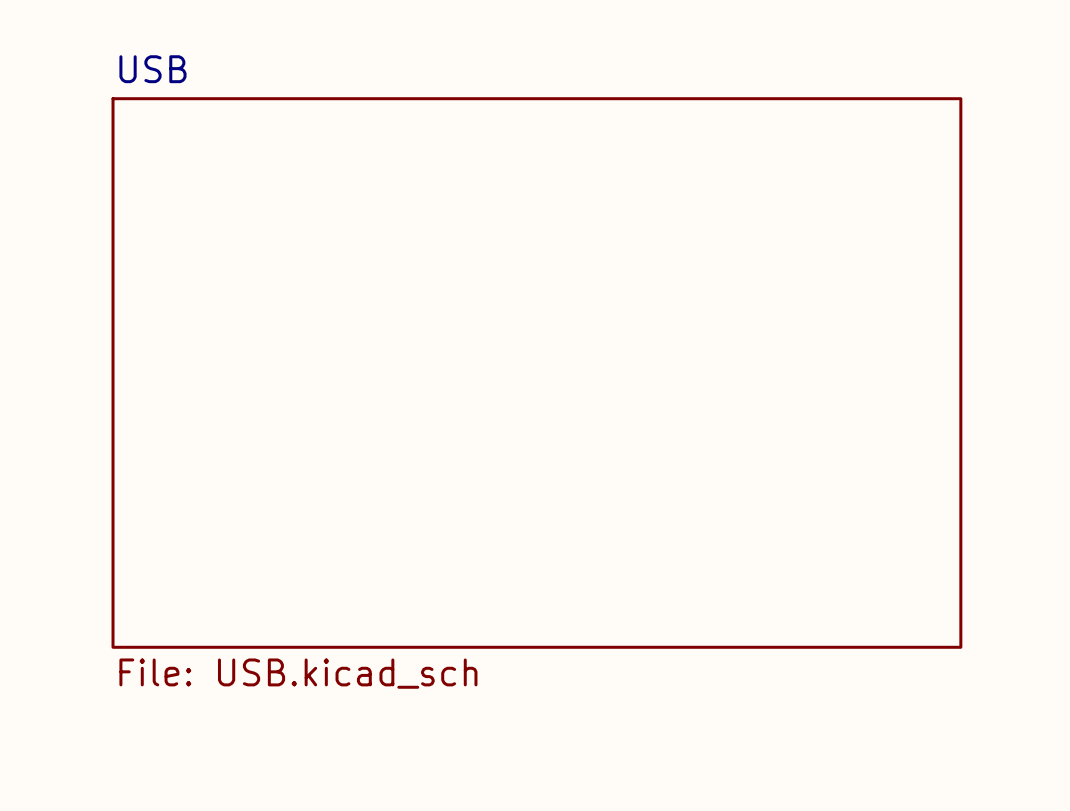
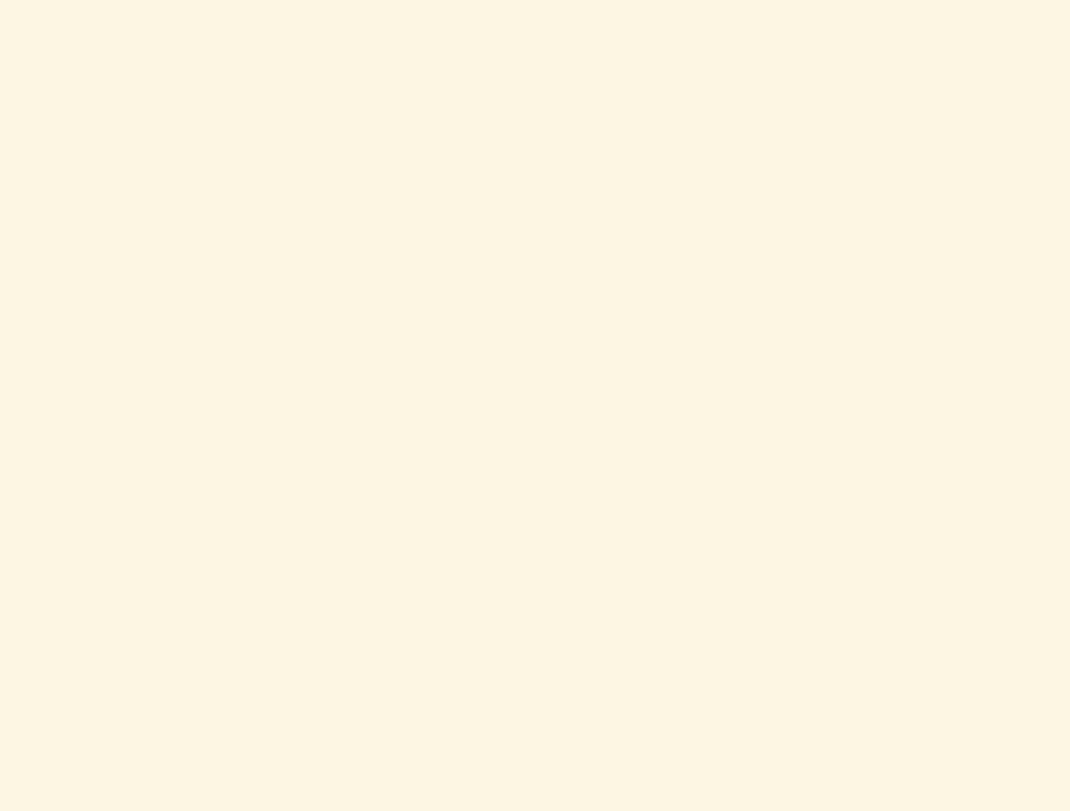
sheet USB: File: USB.kicad_sch (536, 372) -> none

